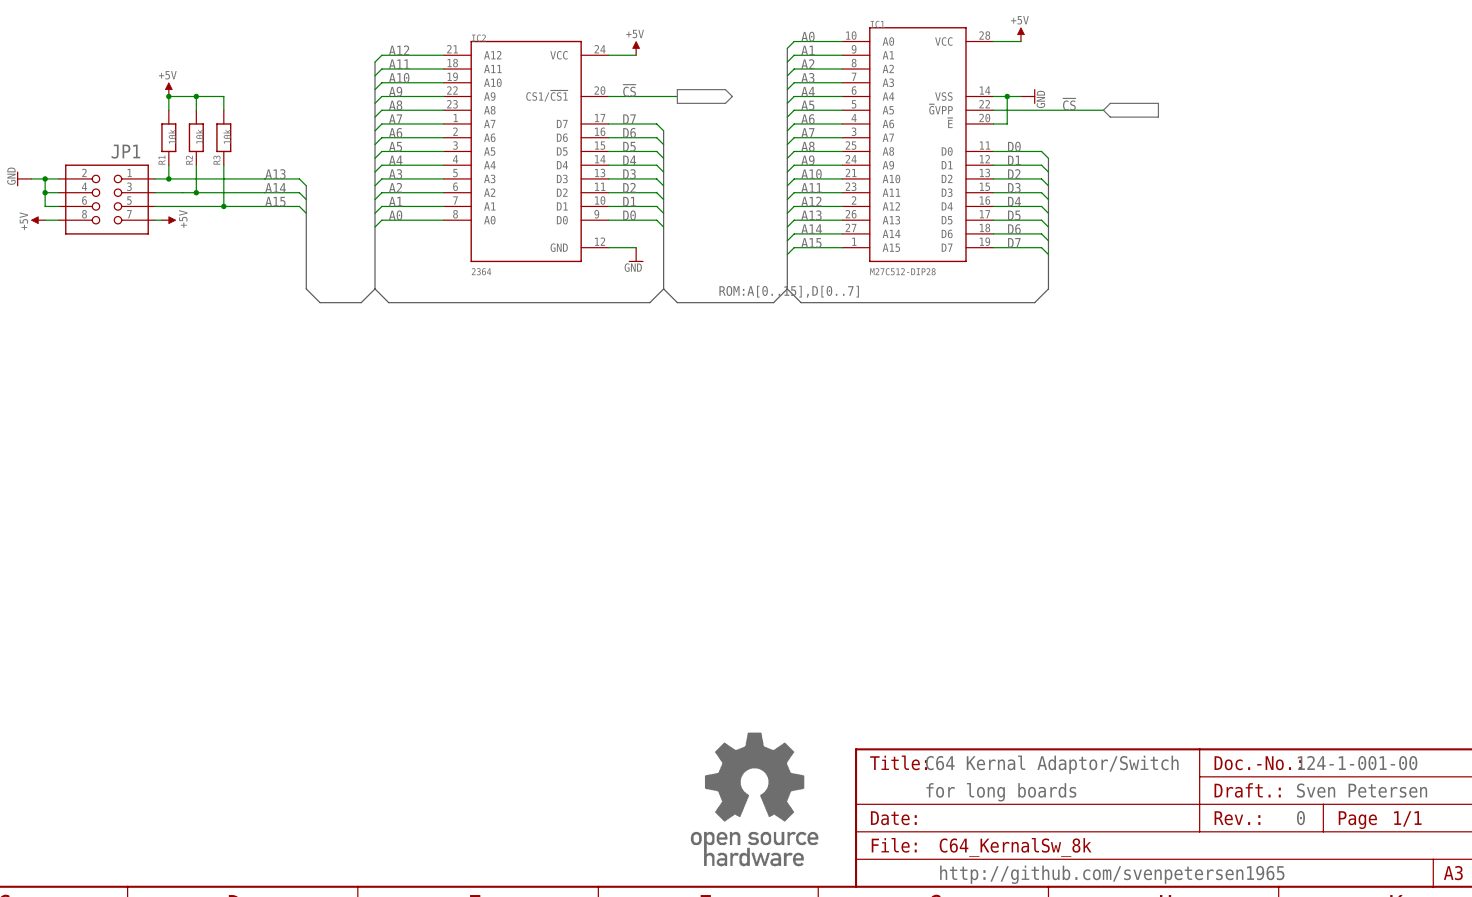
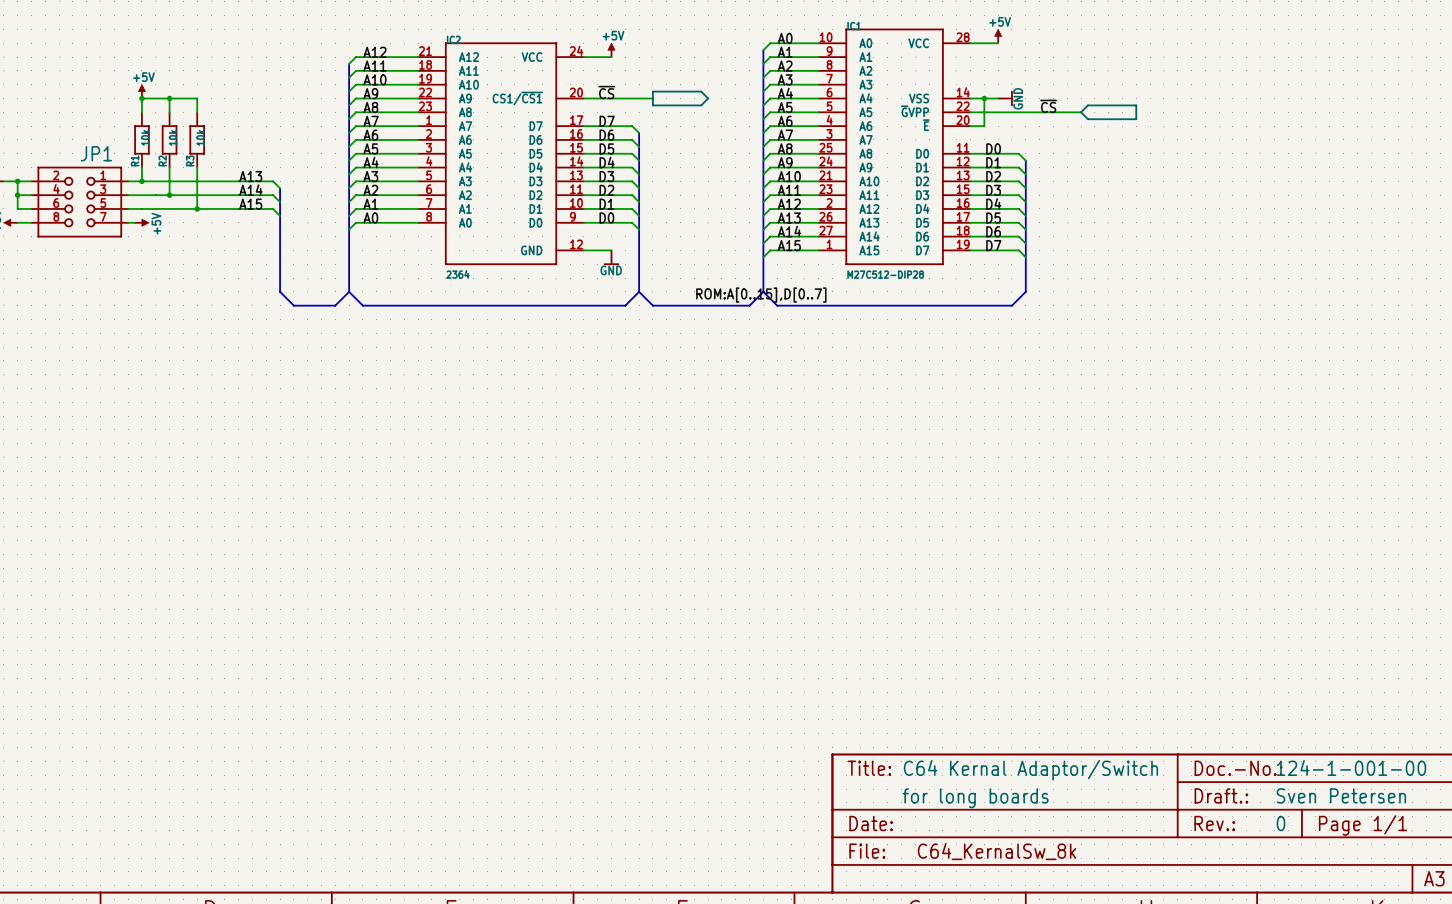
part: (754, 799) -> none
text: http://github.com/svenpetersen1965 (1112, 874) -> none

